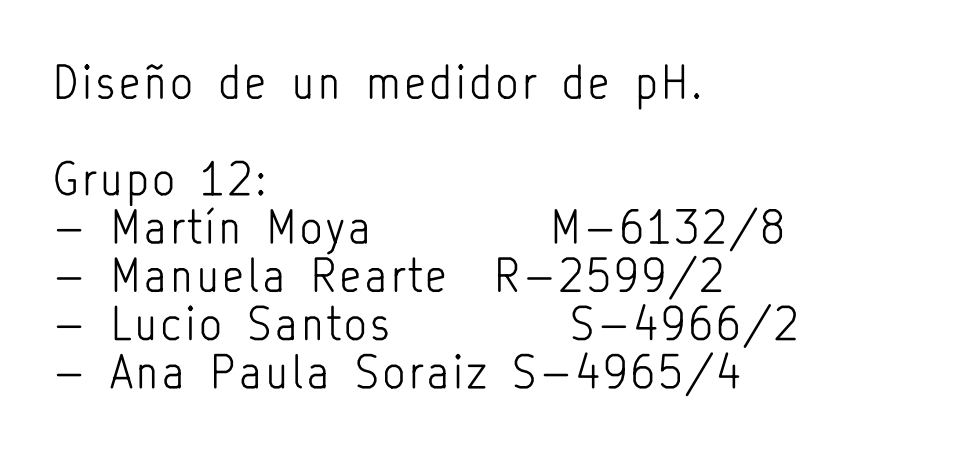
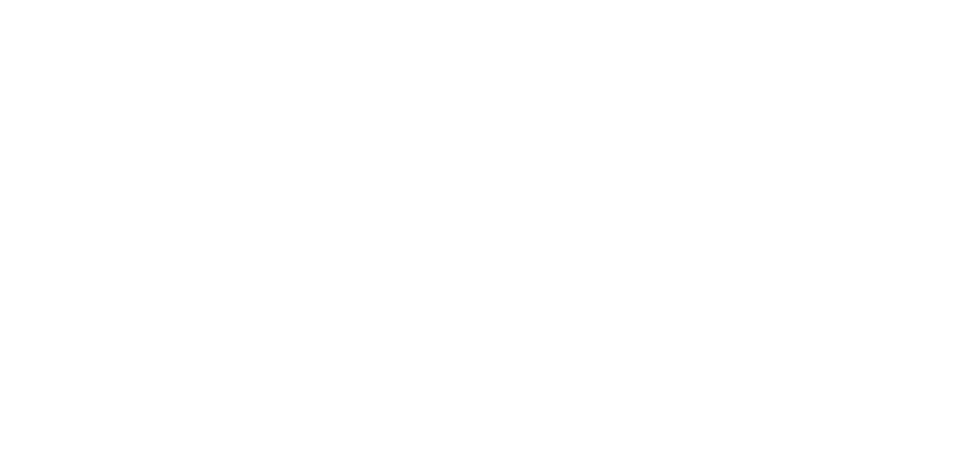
text: Diseño de un medidor de pH. (378, 86) -> none
text: Grupo 12: (159, 183) -> none
text: - Martín Moya M-6132/8 (419, 230) -> none
text: - Manuela Rearte R-2599/2 (389, 277) -> none
text: - Lucio Santos S-4966/2 (426, 325) -> none
text: - Ana Paula Soraiz S-4965/4 (398, 374) -> none

